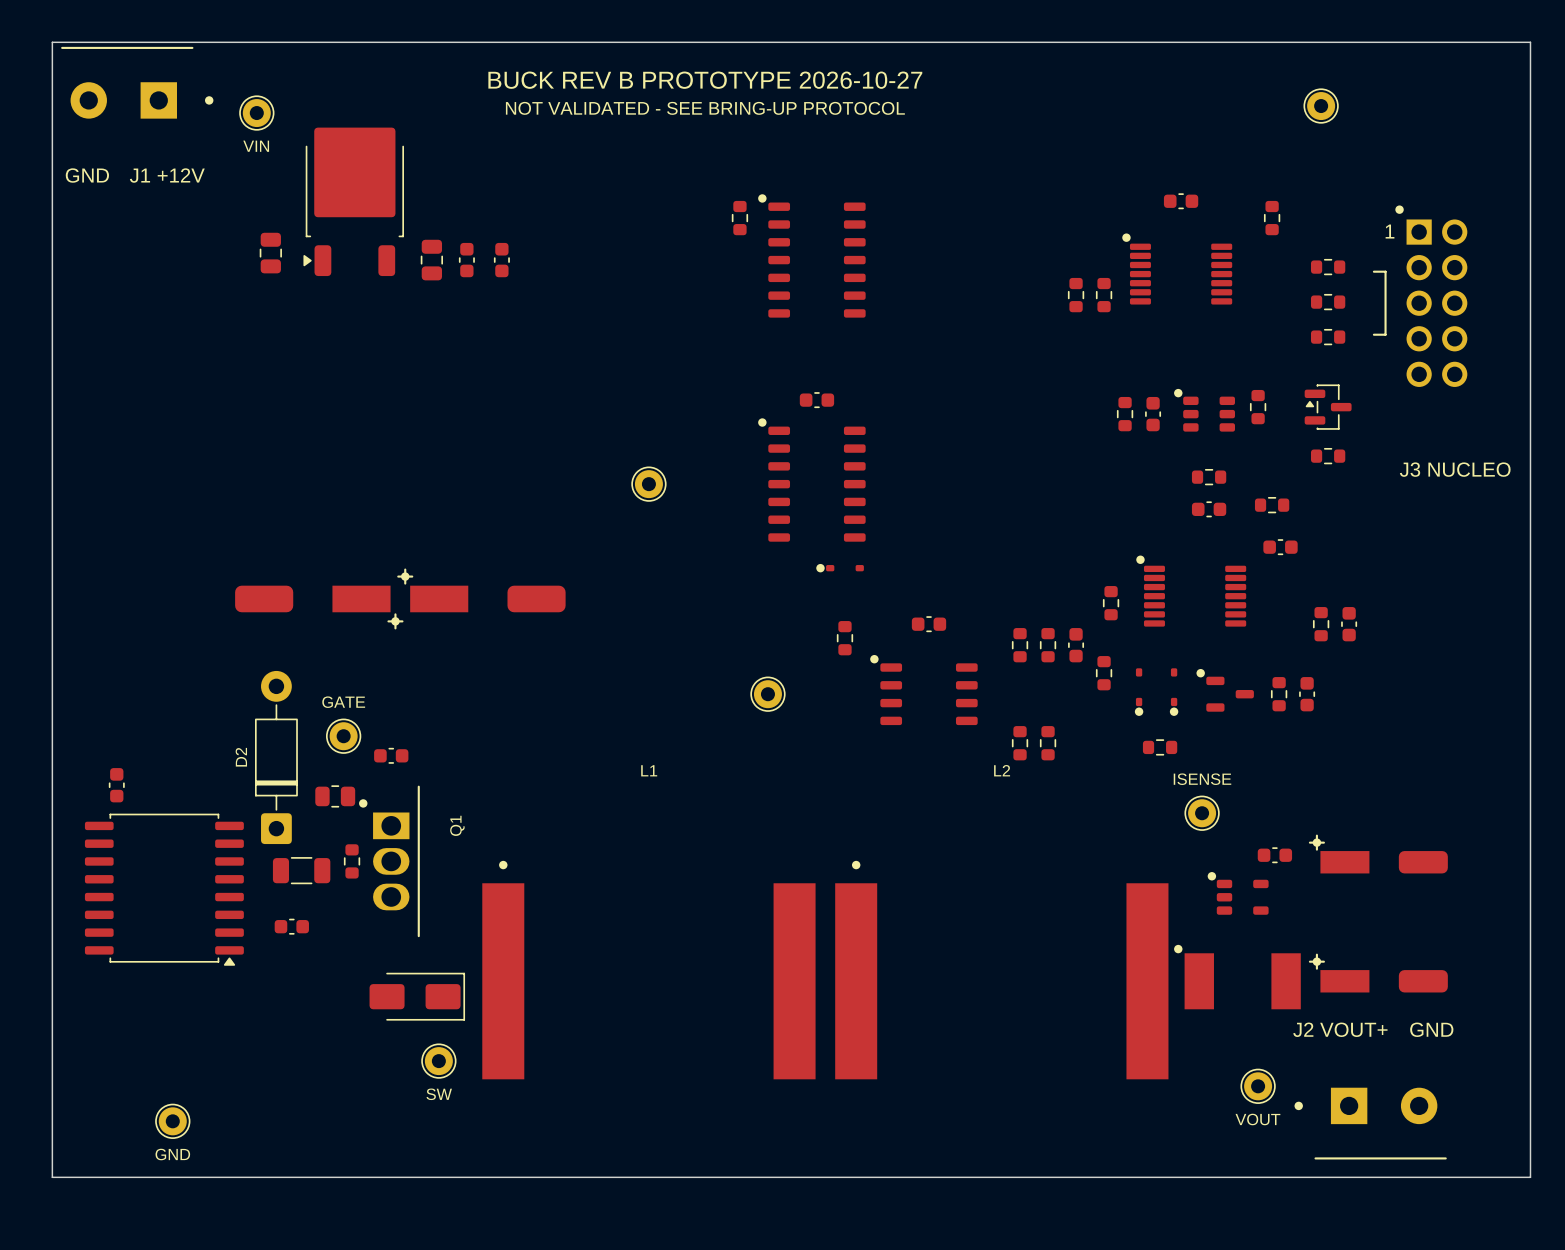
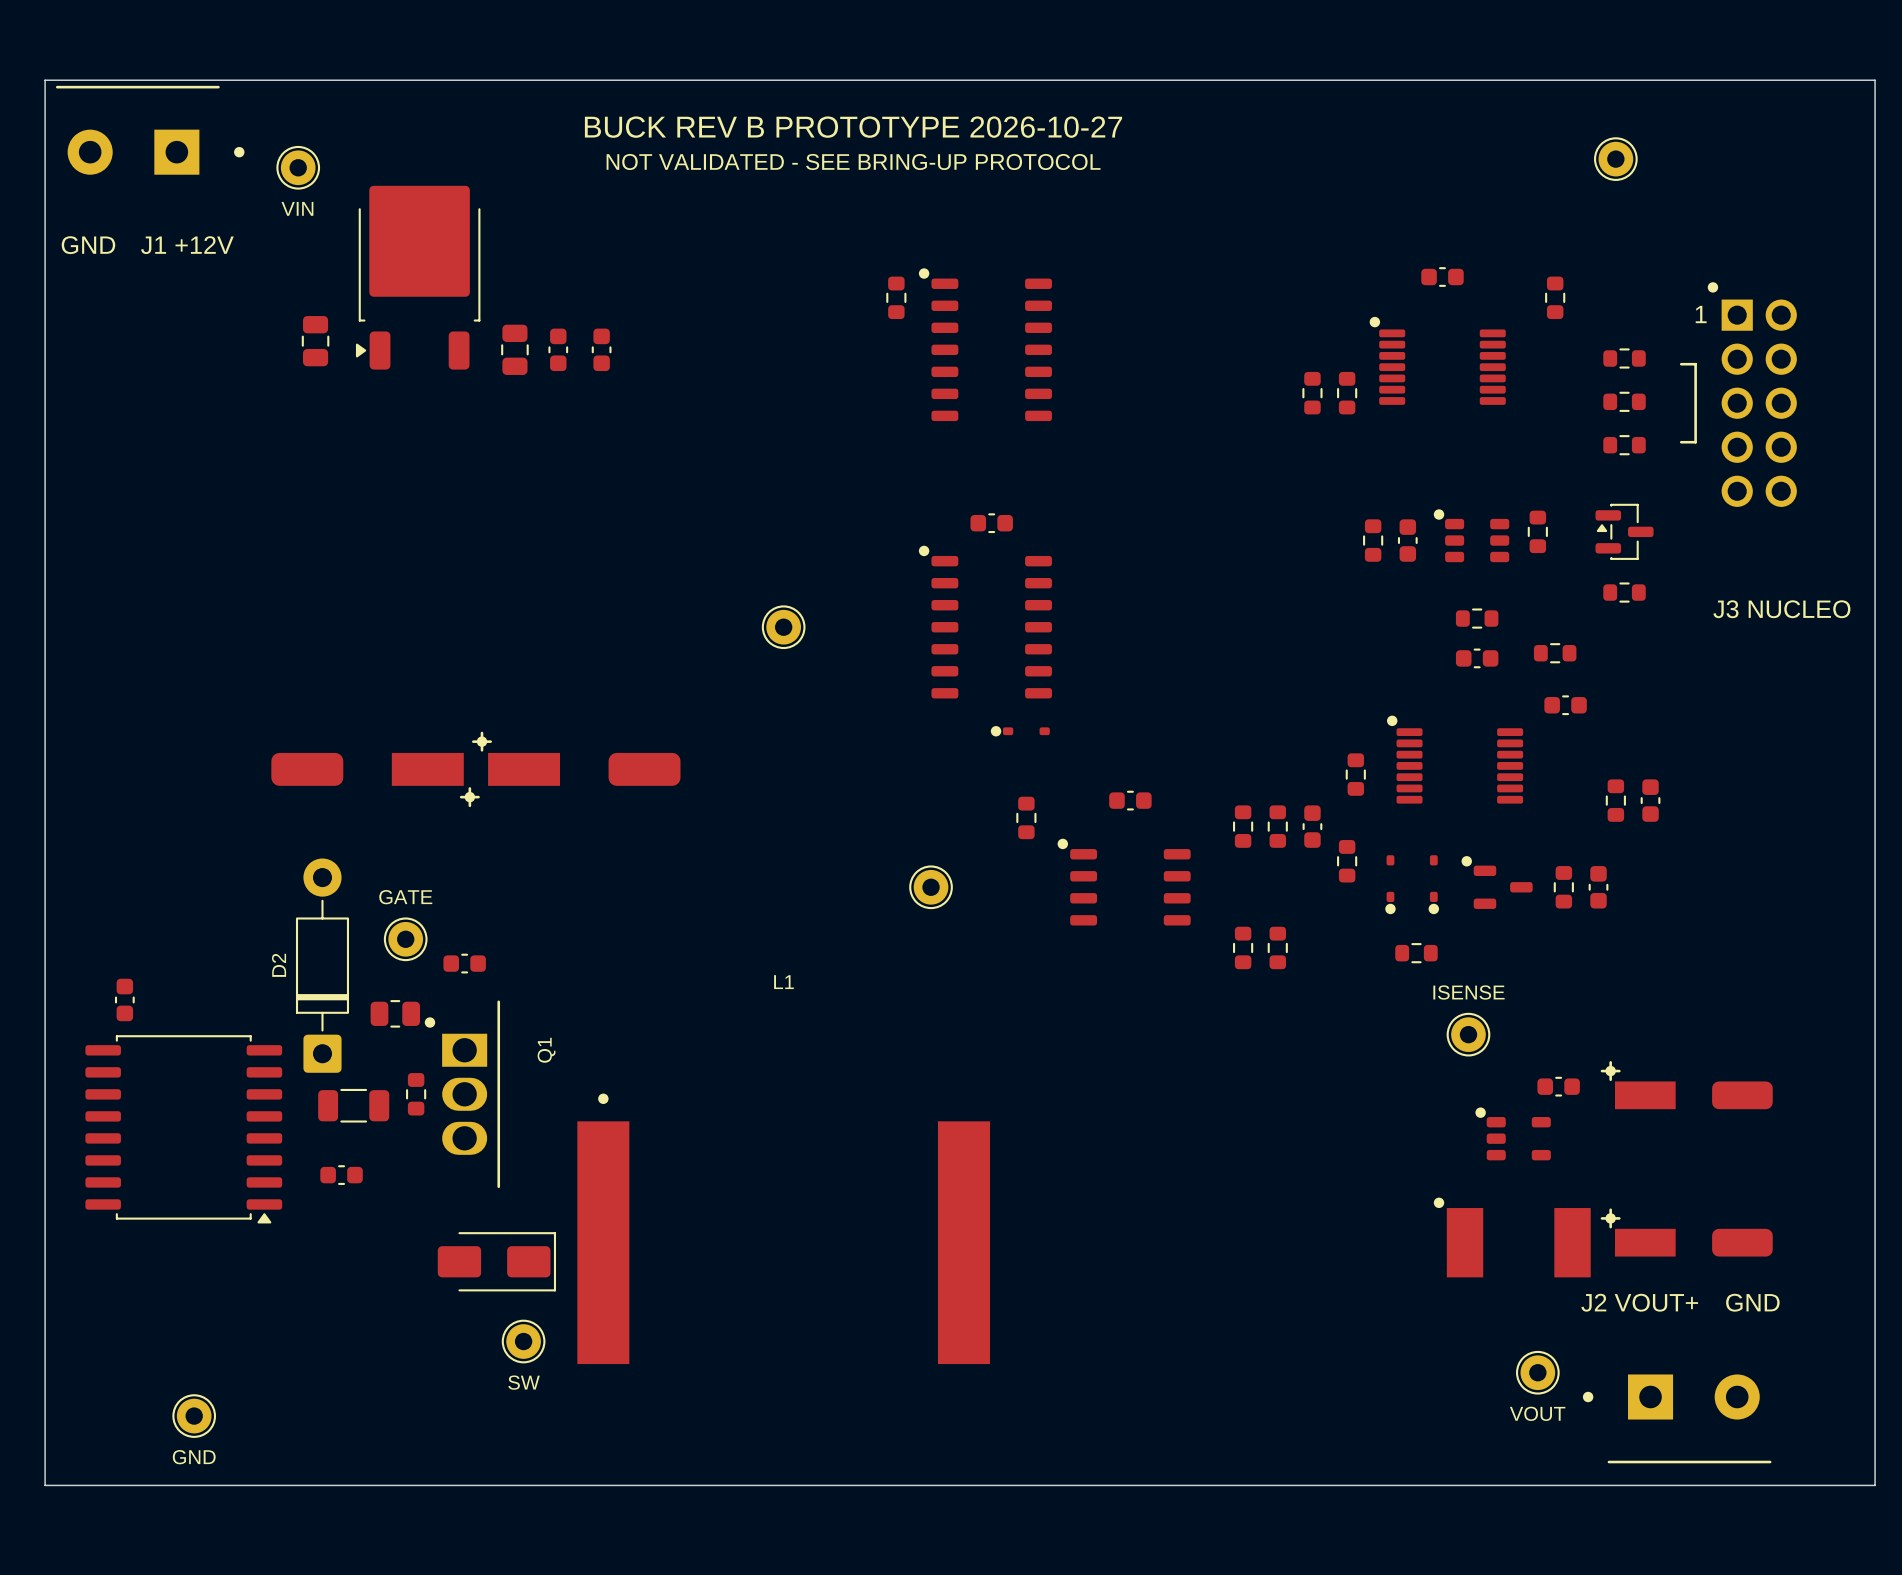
L2: (1001, 970) -> none

